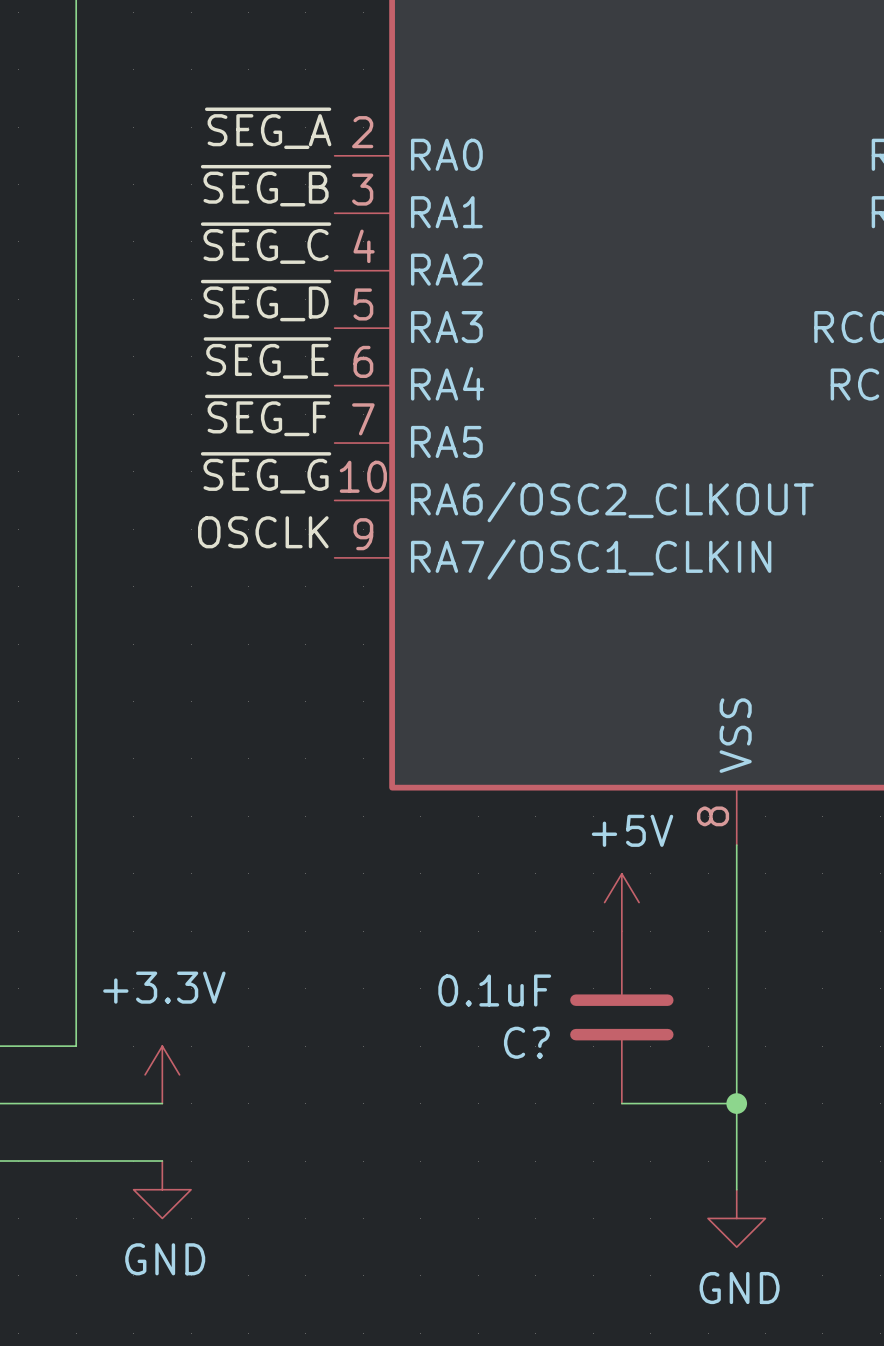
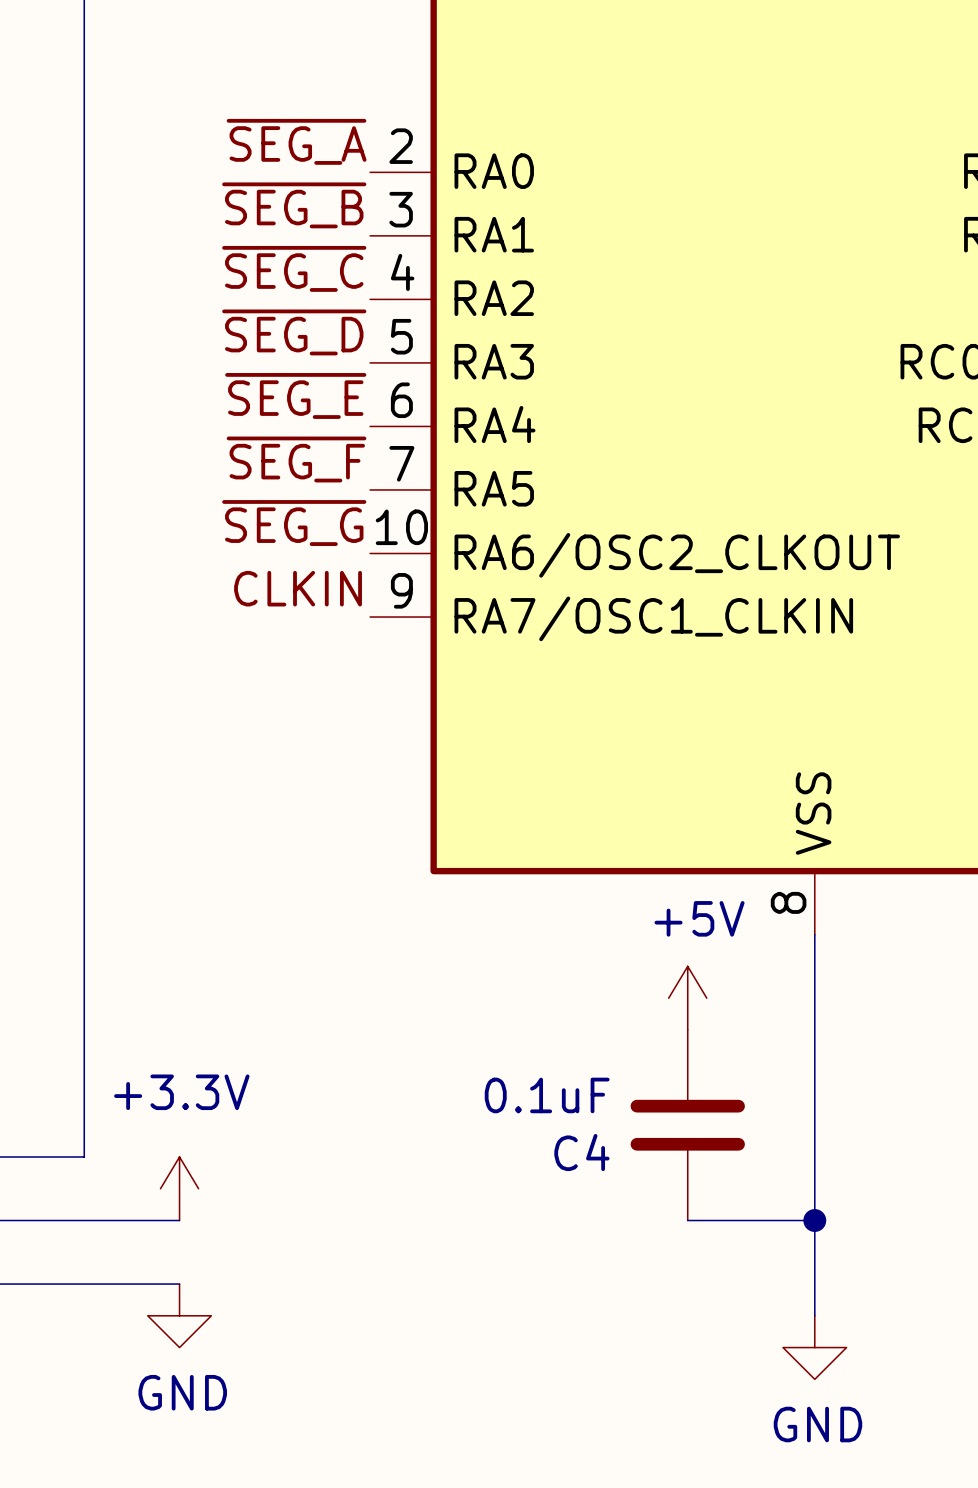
label: OSCLK (263, 532) -> CLKIN (298, 588)
C? name: C? (526, 1042) -> C4 (581, 1152)

